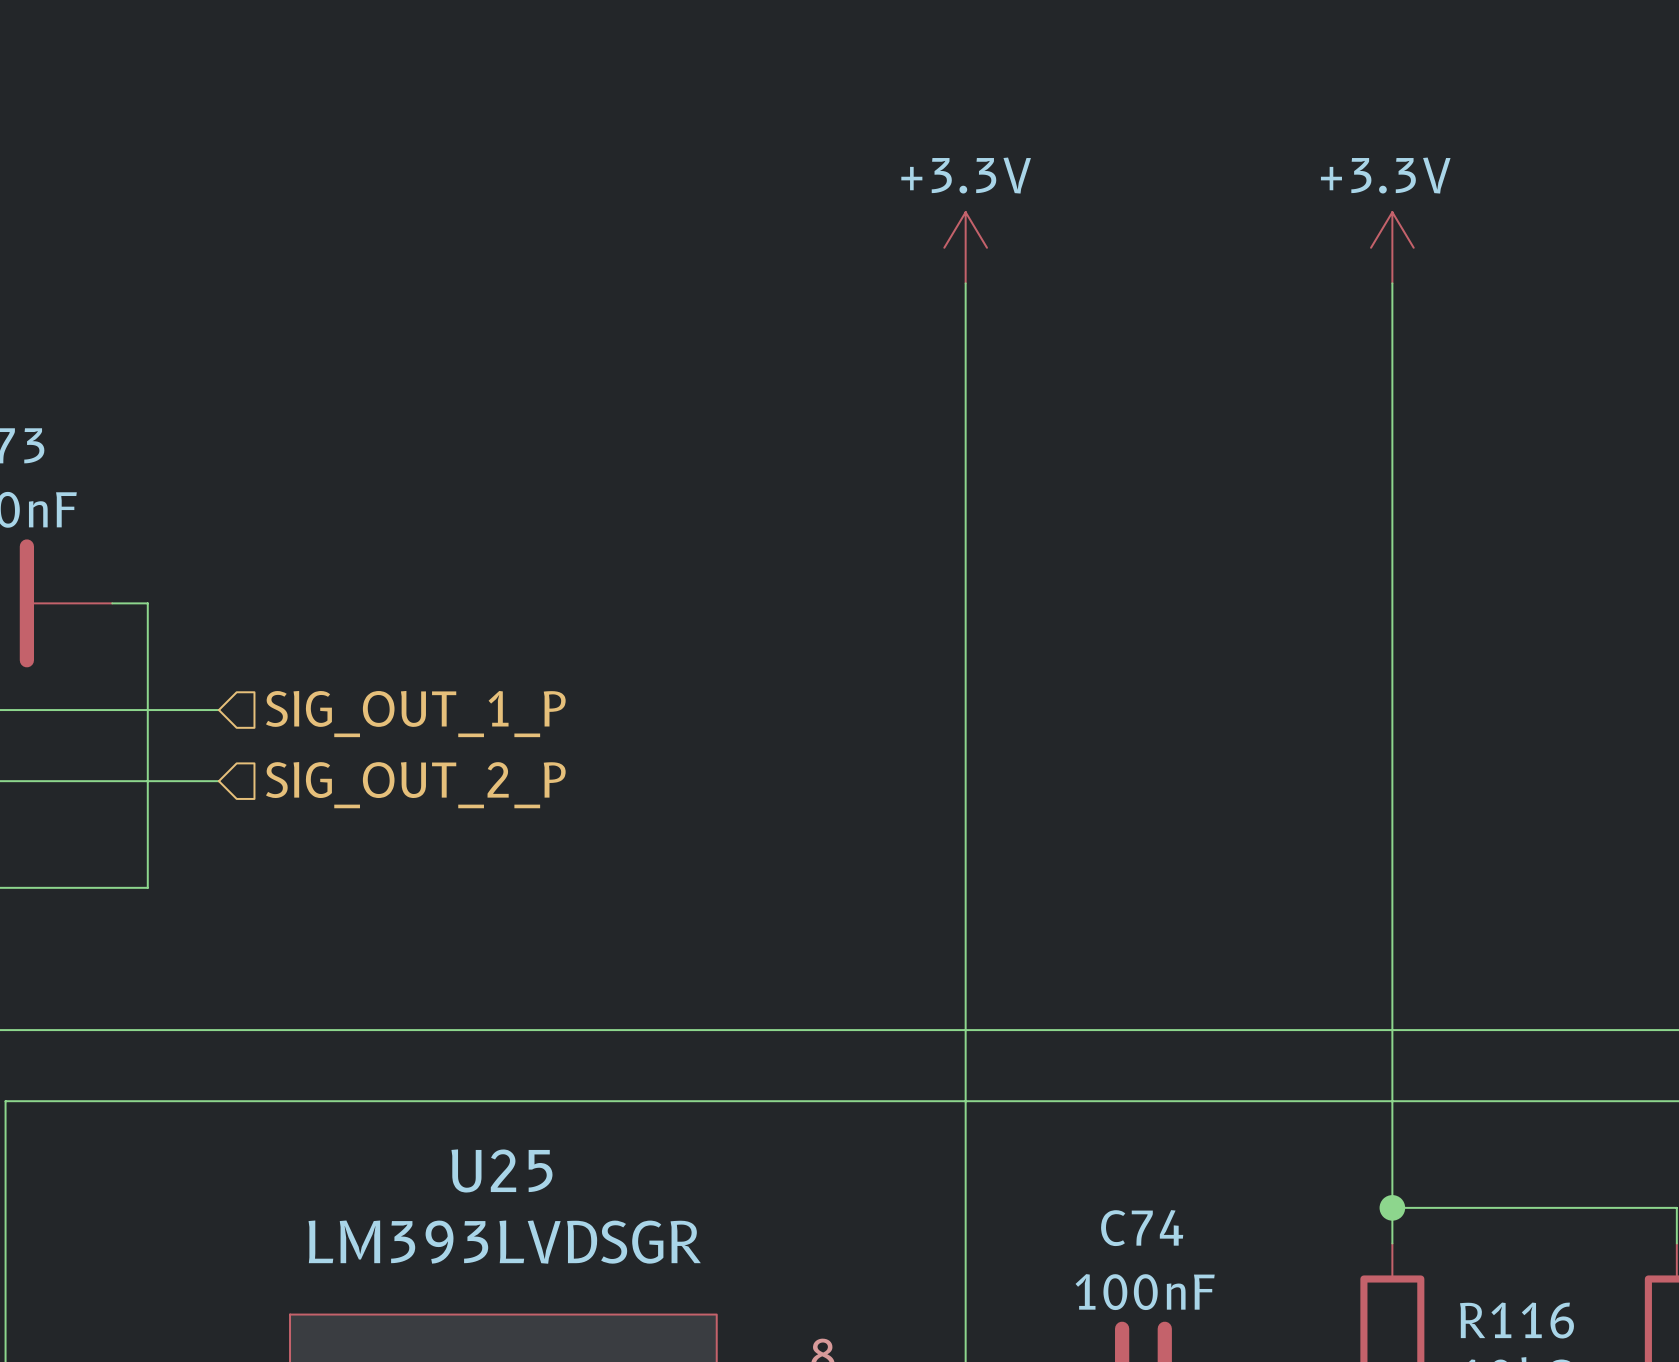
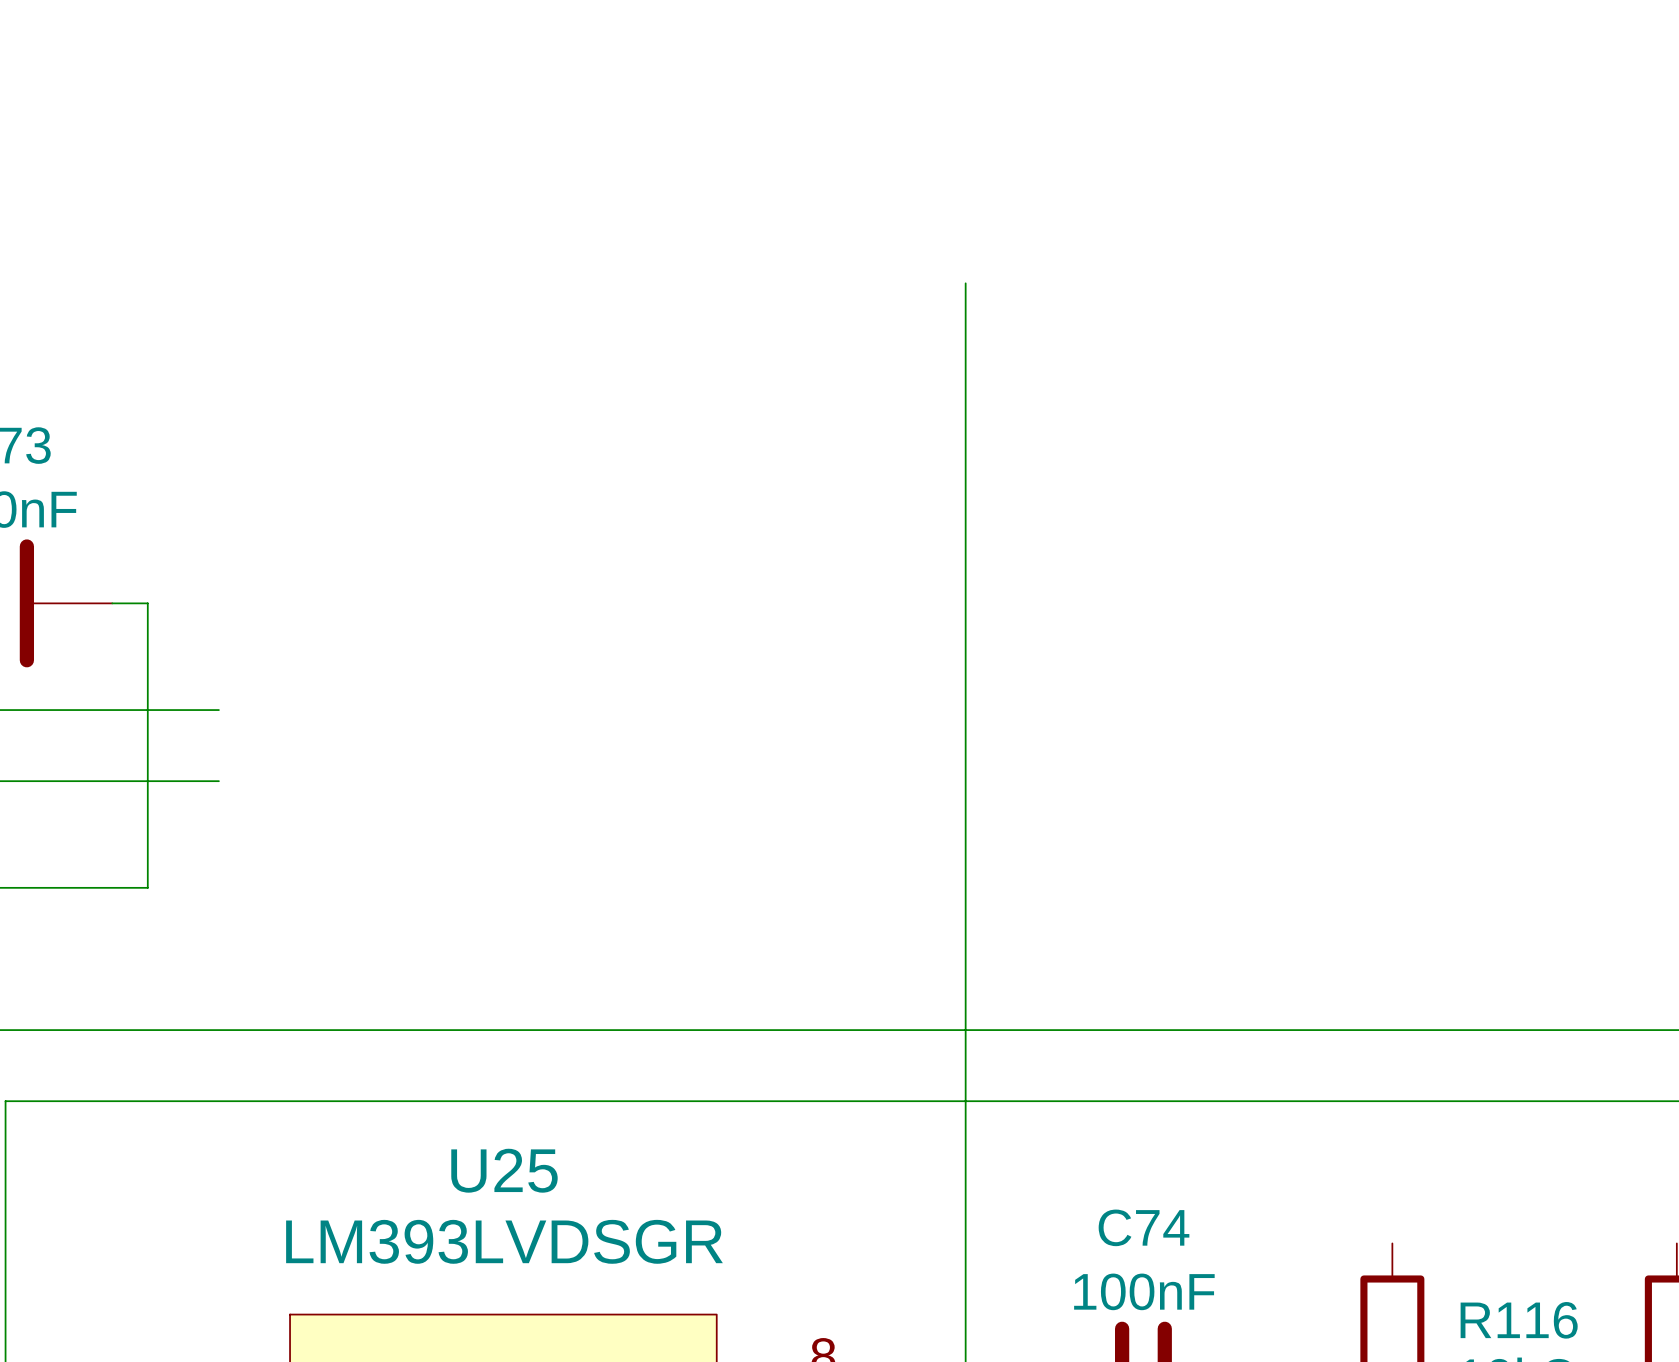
power symbol: +3.3V (965, 247) -> none
power symbol: +3.3V (1392, 247) -> none
wire: (1392, 283) (1392, 1243) -> none
hierarchical label: SIG_OUT_1_P (415, 714) -> none
hierarchical label: SIG_OUT_2_P (415, 785) -> none
wire: (1392, 1207) (1676, 1207) (1676, 1243) -> none
junction: (1392, 1207) -> none

